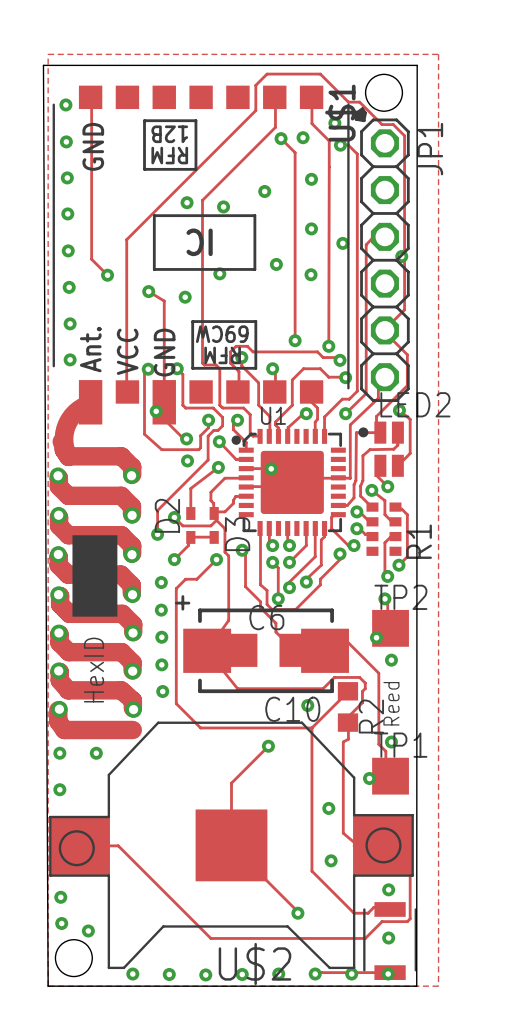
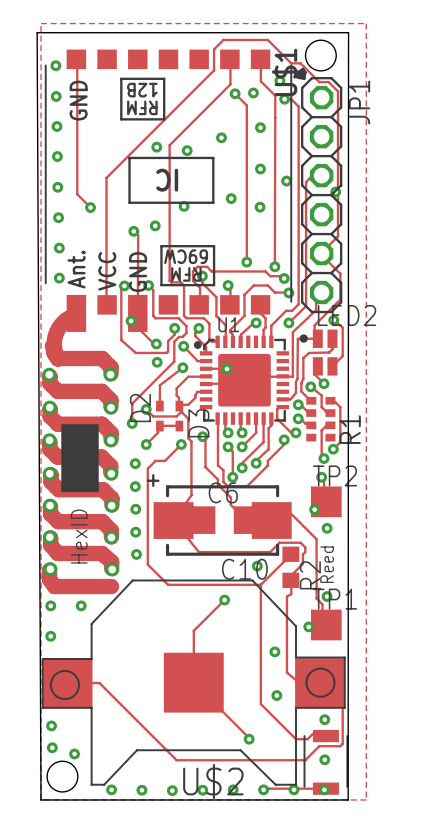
track: (148, 291) (164, 301) (164, 402) -> (133, 231) (138, 235) (137, 313)
via position: (148, 291) -> (133, 231)

